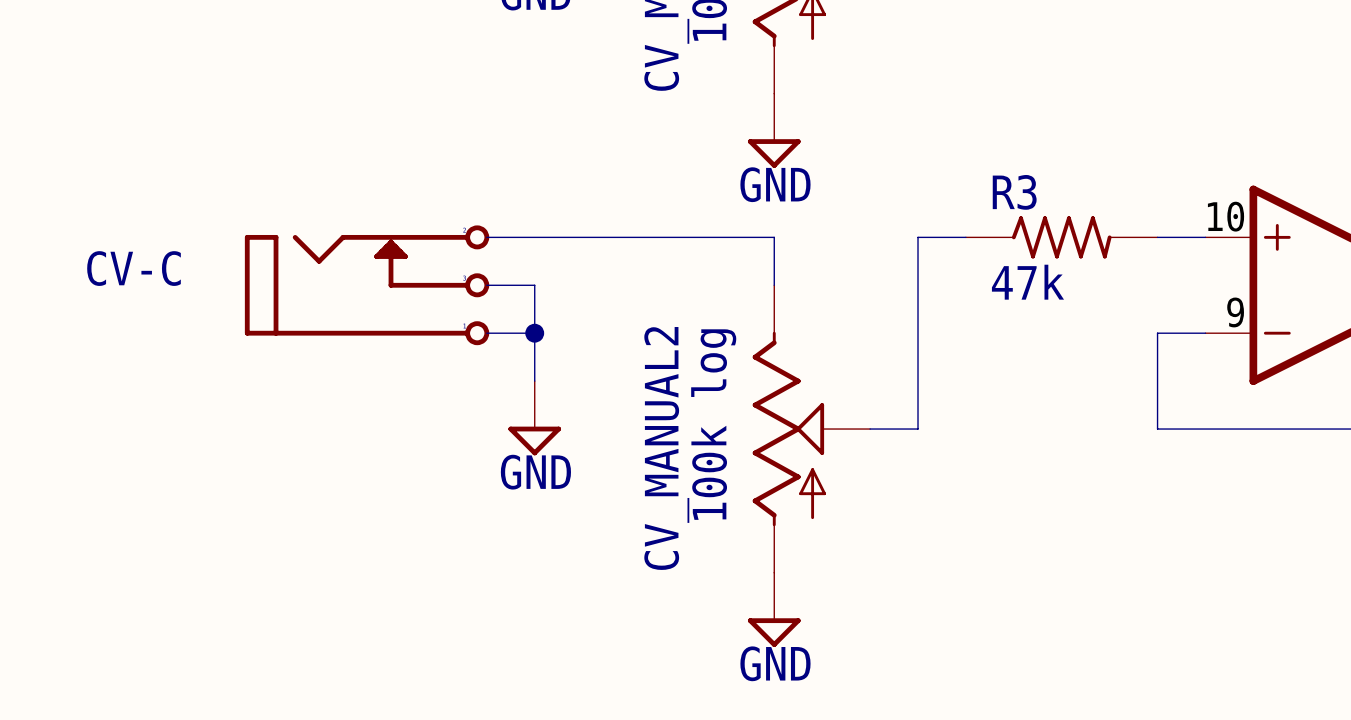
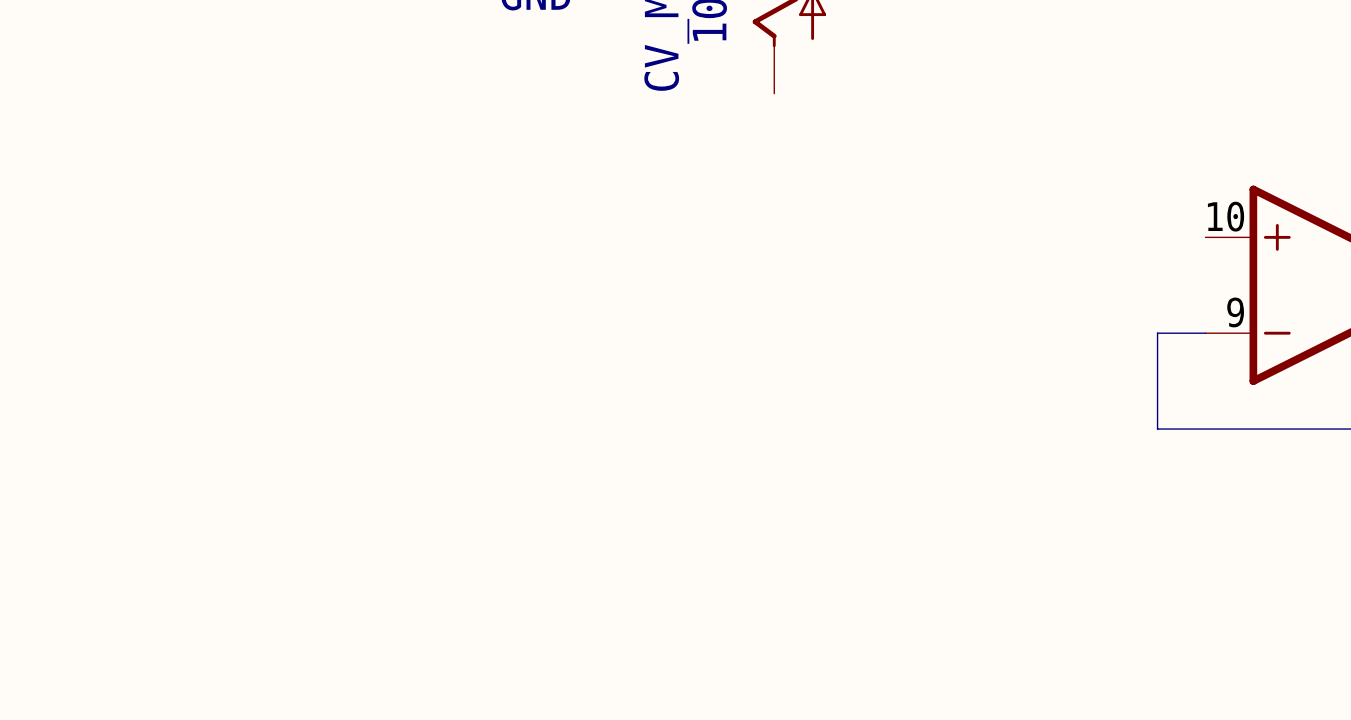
power symbol: GND (774, 130) -> none
wire: (486, 237) (774, 237) (774, 285) -> none
wire: (965, 237) (918, 237) (918, 429) (870, 429) -> none
R3: 47k (1061, 237) -> none
wire: (1157, 237) (1205, 237) -> none
CV-C: (367, 285) -> none
wire: (486, 285) (534, 285) (534, 381) -> none
wire: (486, 333) (534, 333) -> none
junction: (534, 333) -> none
power symbol: GND (534, 418) -> none
CV_MANUAL2: 100k log (811, 429) -> none
power symbol: GND (774, 609) -> none

